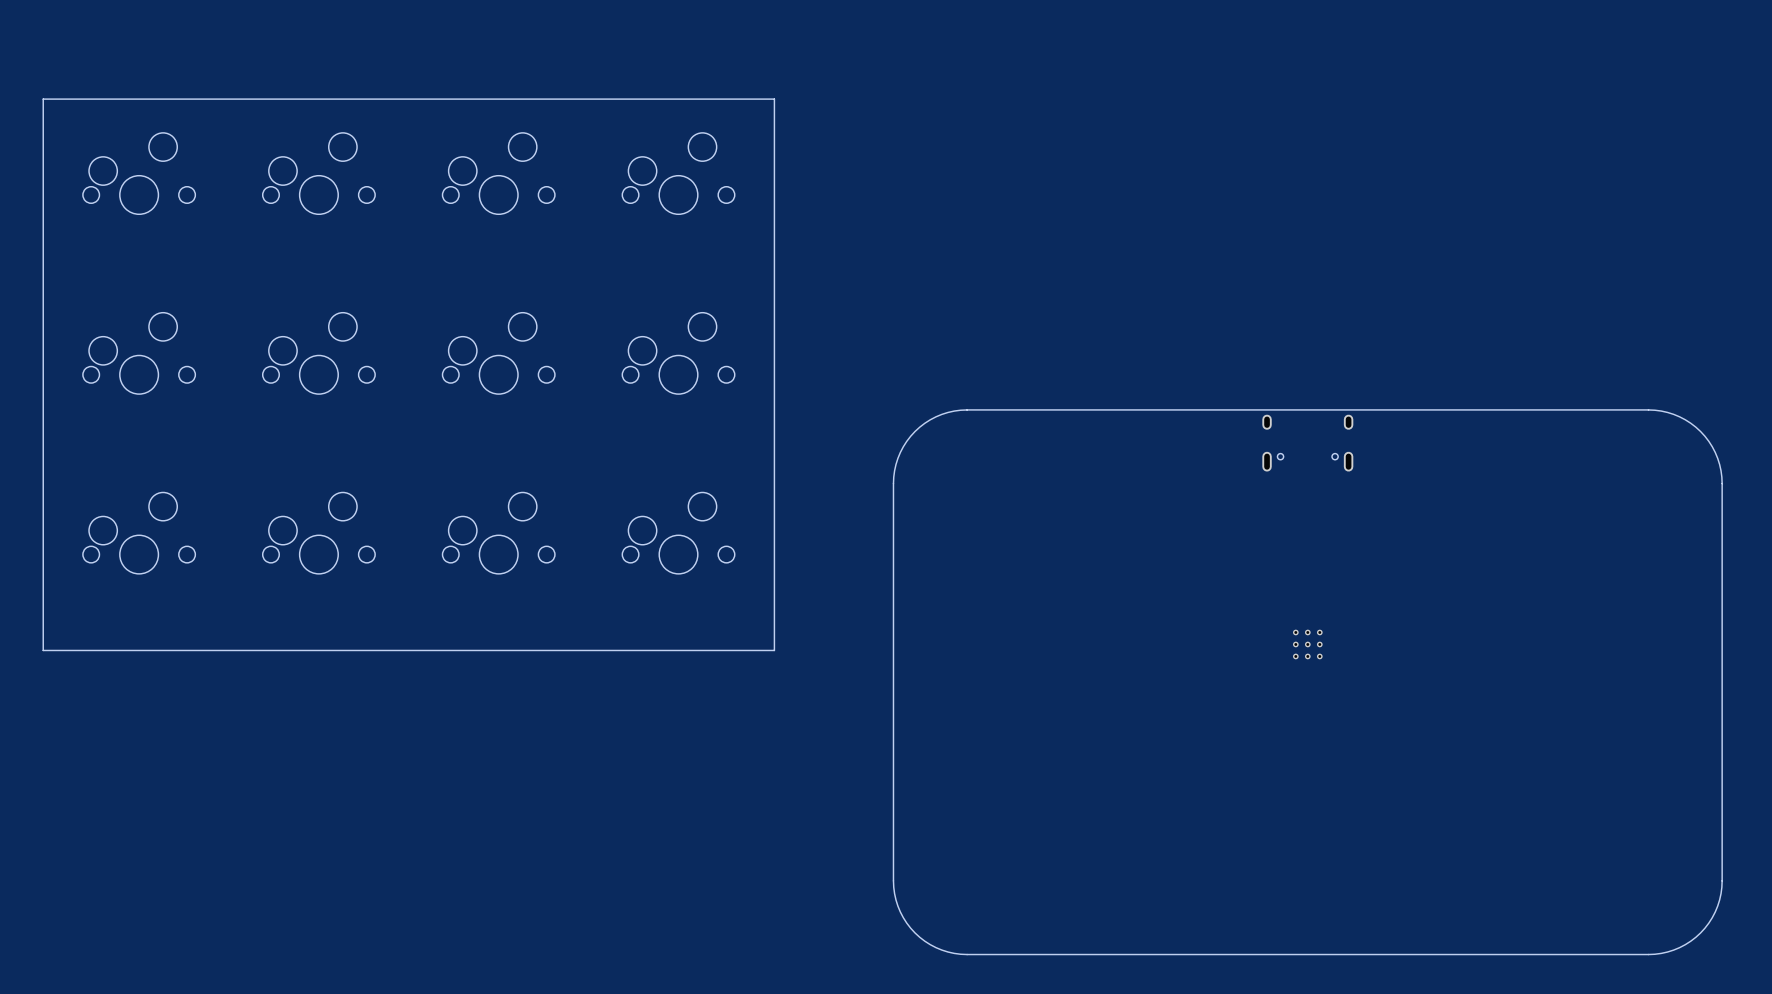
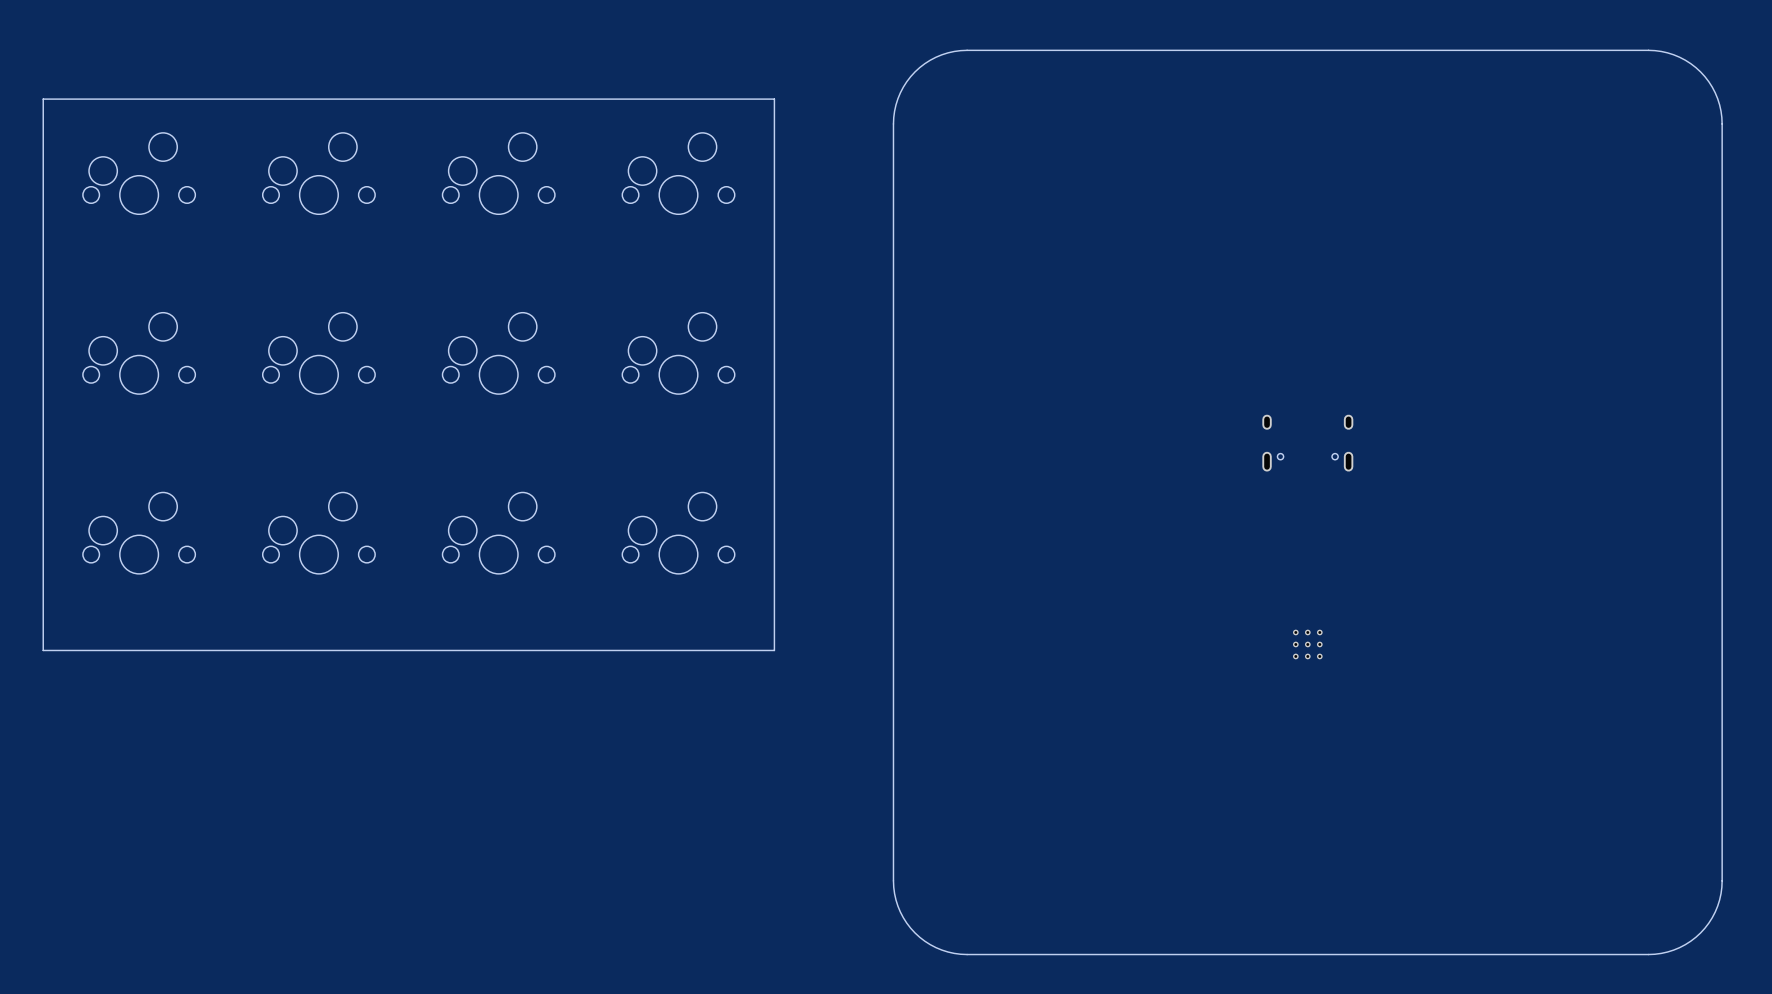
board edge: (893, 483) (895, 464) (900, 452) (915, 431) (935, 416) (960, 410) (1648, 409) (1661, 411) (1679, 416) (1695, 427) (1708, 441) (1717, 458) (1721, 477) (1722, 880) -> (893, 483) (893, 117) (895, 104) (903, 87) (915, 71) (930, 60) (948, 52) (967, 50) (1648, 50) (1667, 52) (1679, 57) (1695, 67) (1708, 81) (1717, 98) (1721, 117) (1722, 880)

